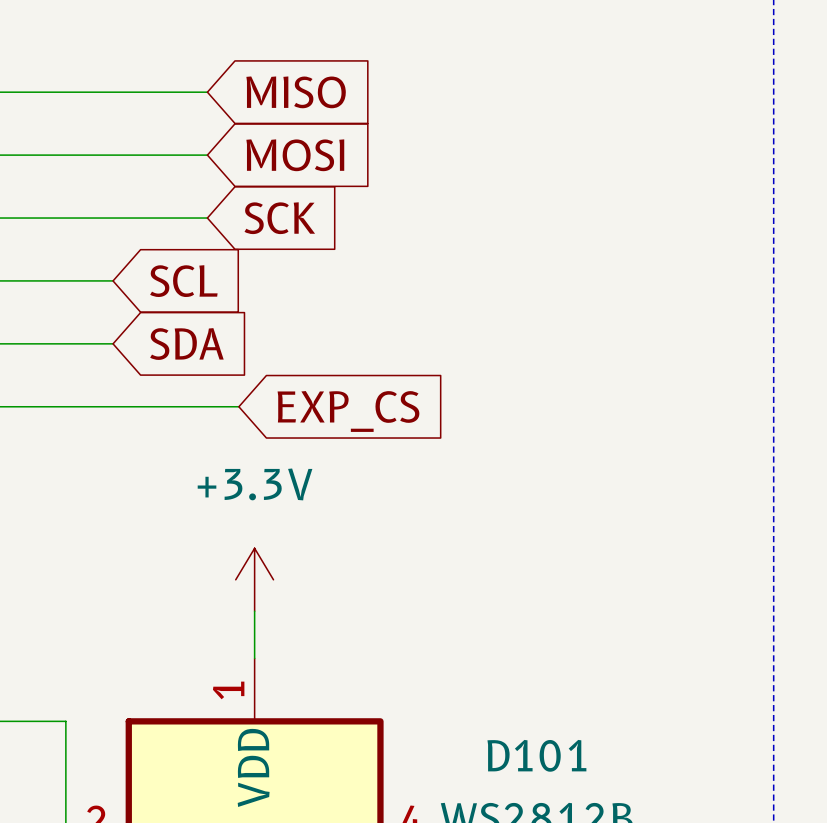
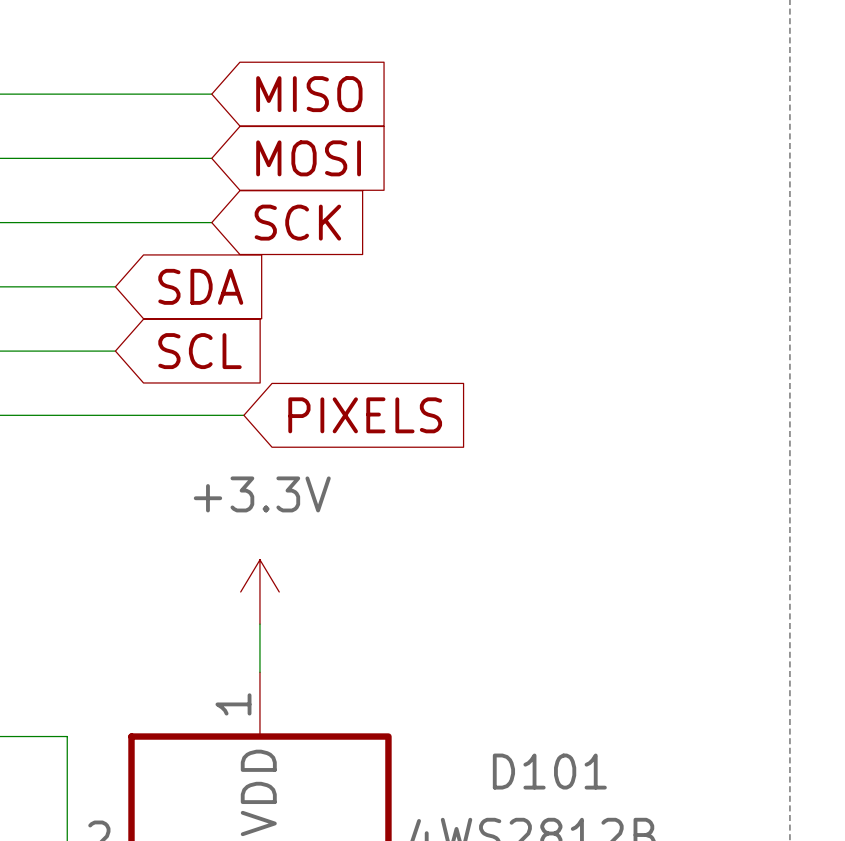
global label: SCL (183, 281) -> SDA (200, 286)
global label: SDA (186, 344) -> SCL (199, 351)
global label: EXP_CS (348, 411) -> PIXELS (365, 415)

